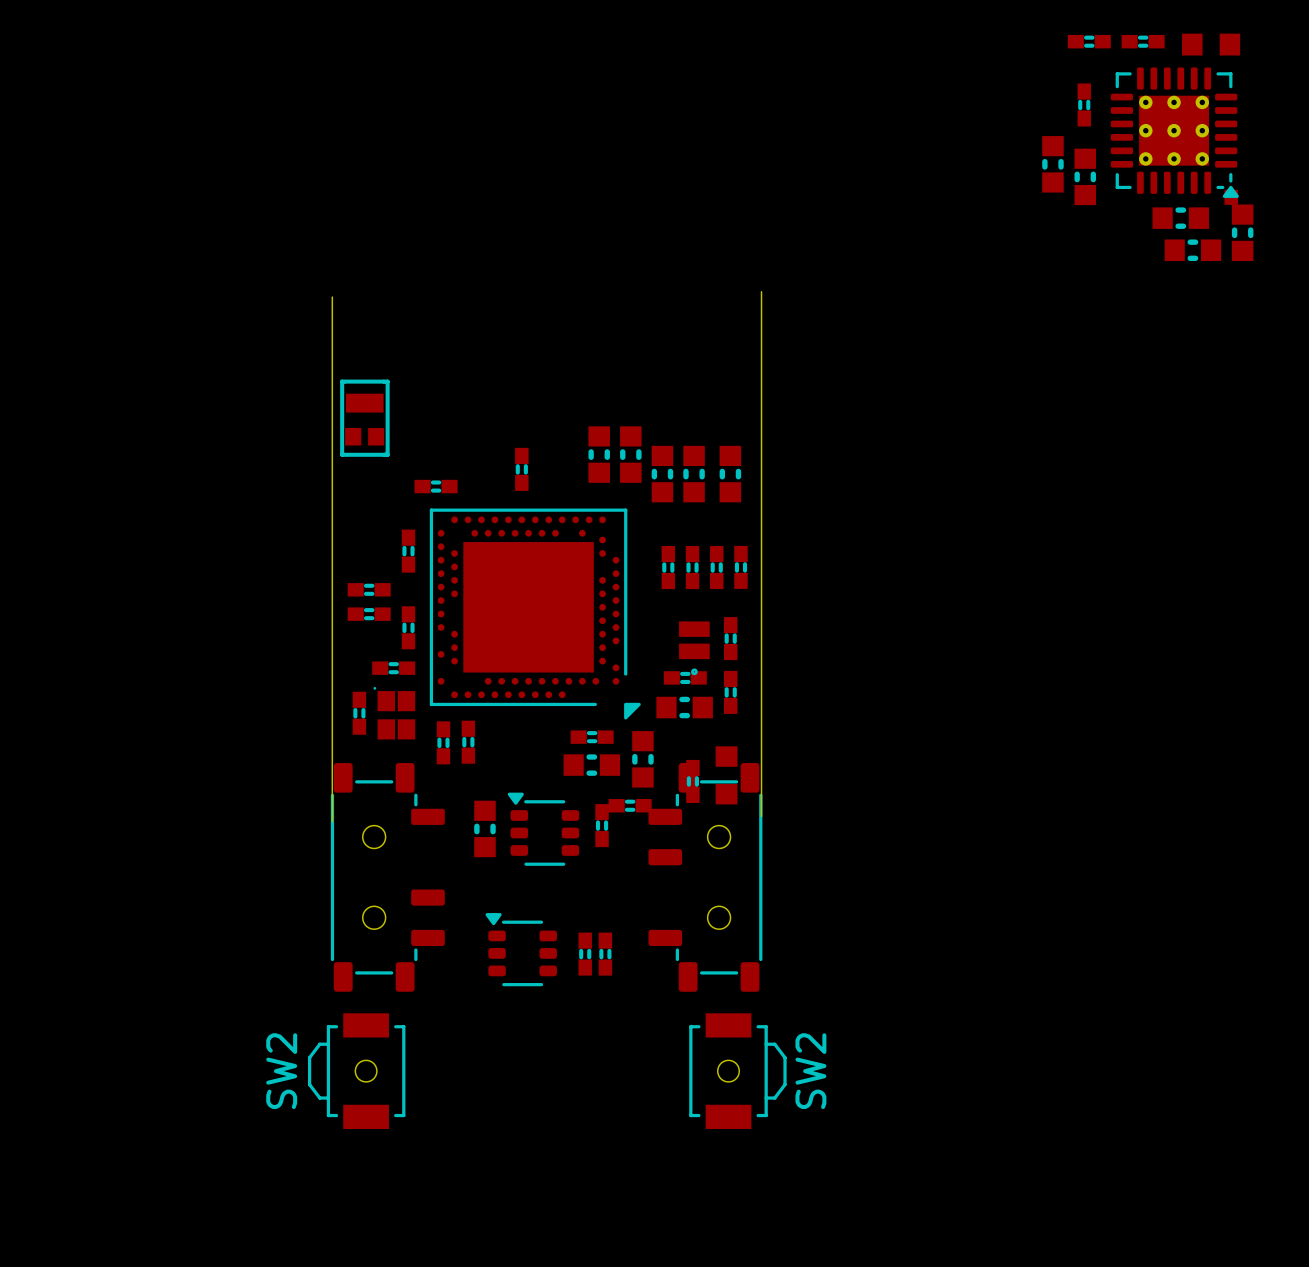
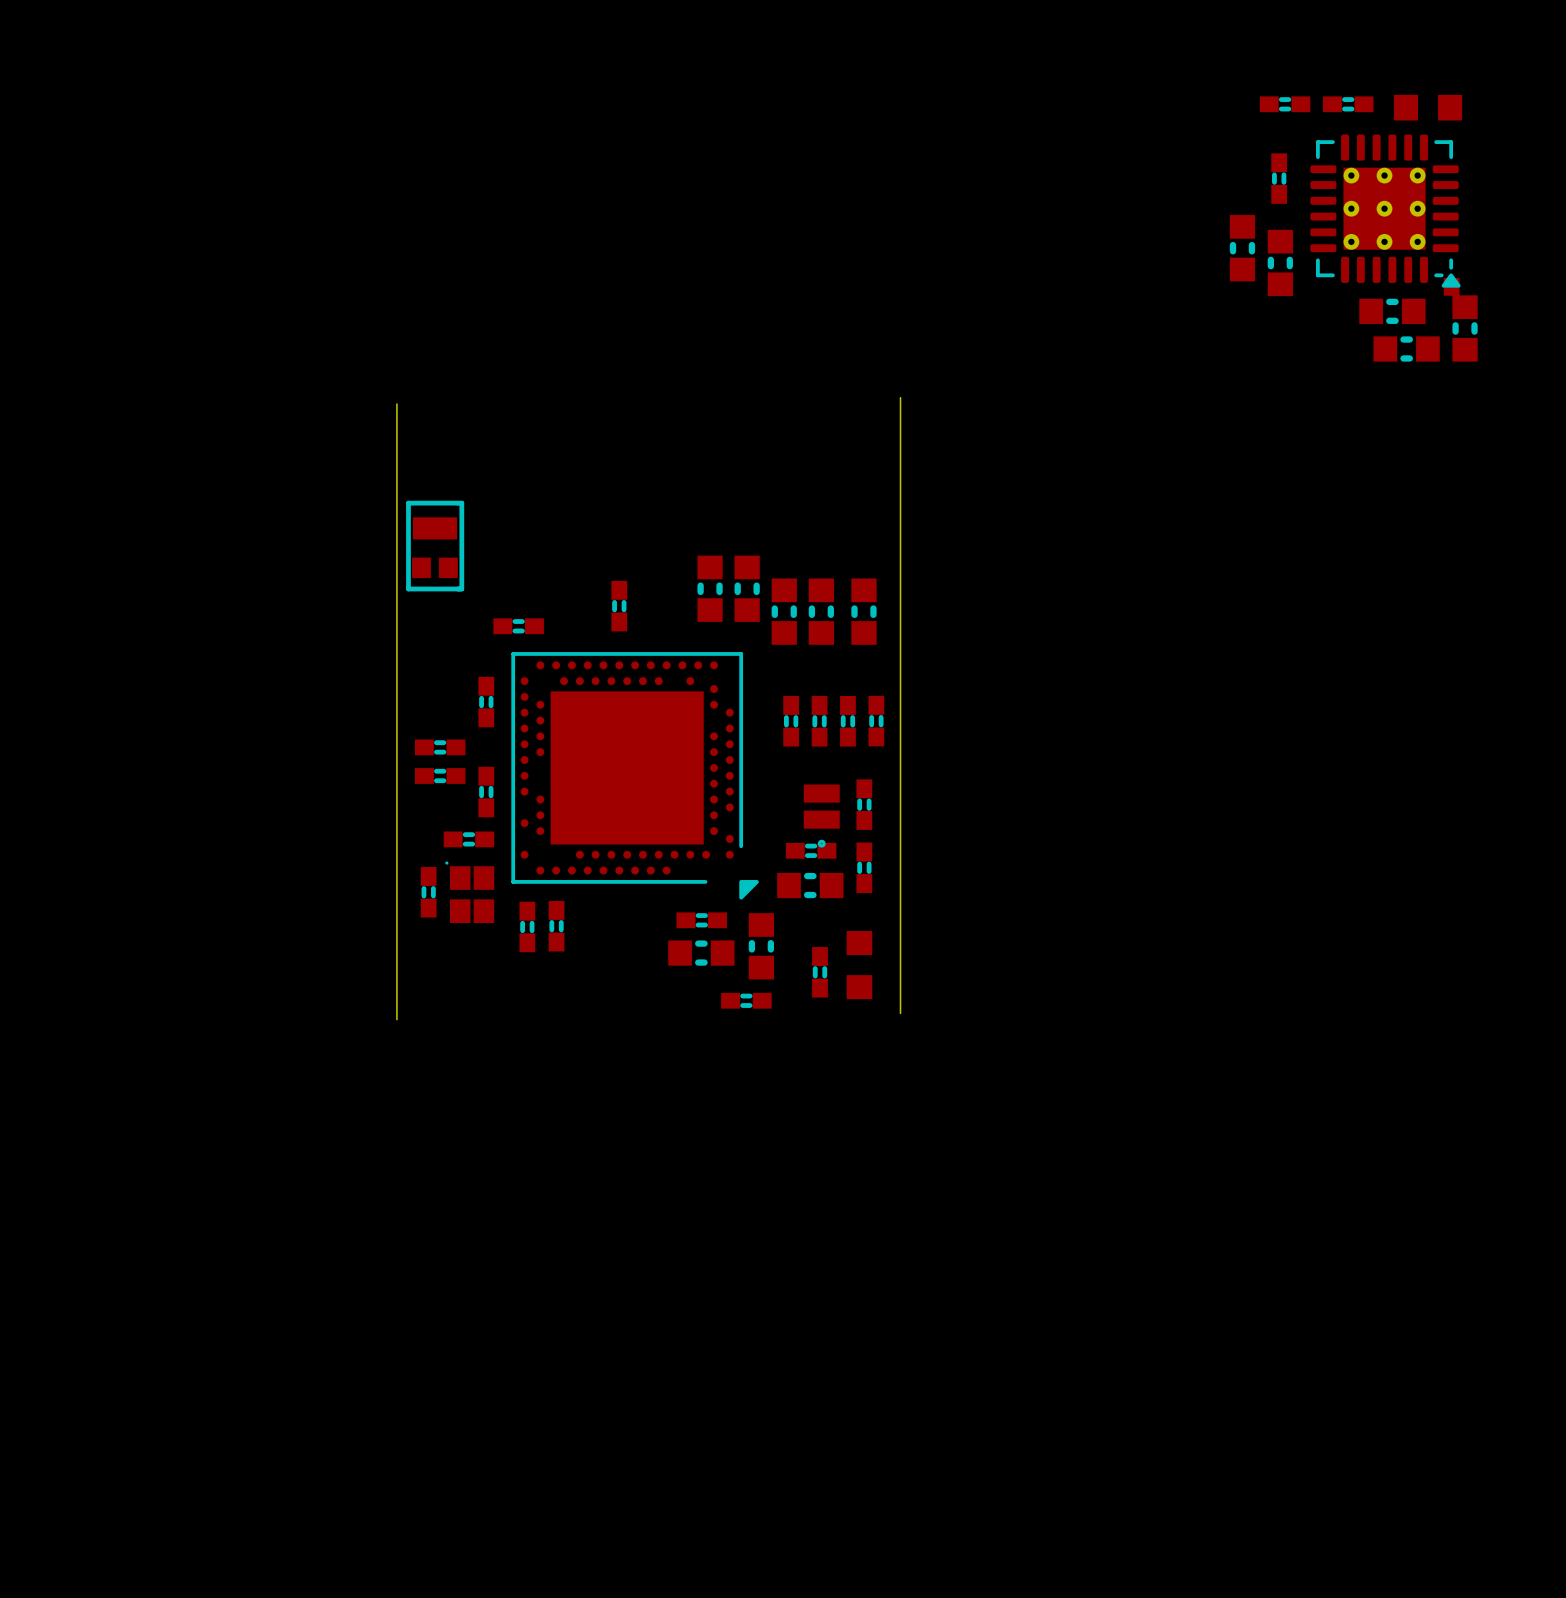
part: (602, 825) -> none
part: (484, 828) -> none
part: (543, 829) -> none
part: (387, 877) -> none
part: (705, 877) -> none
part: (521, 949) -> none
part: (585, 954) -> none
part: (605, 954) -> none
SW2: (356, 1071) -> none
SW2: (737, 1071) -> none

